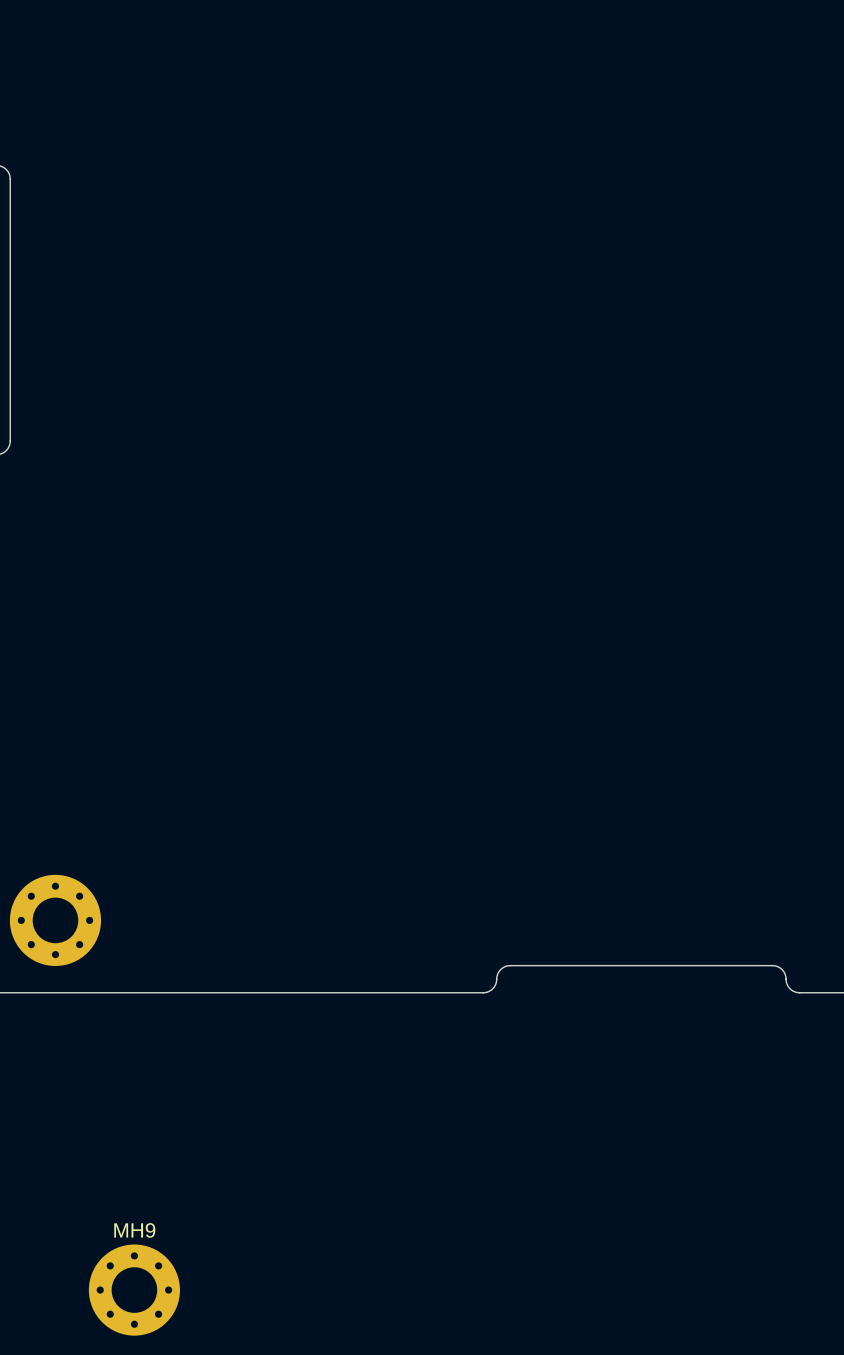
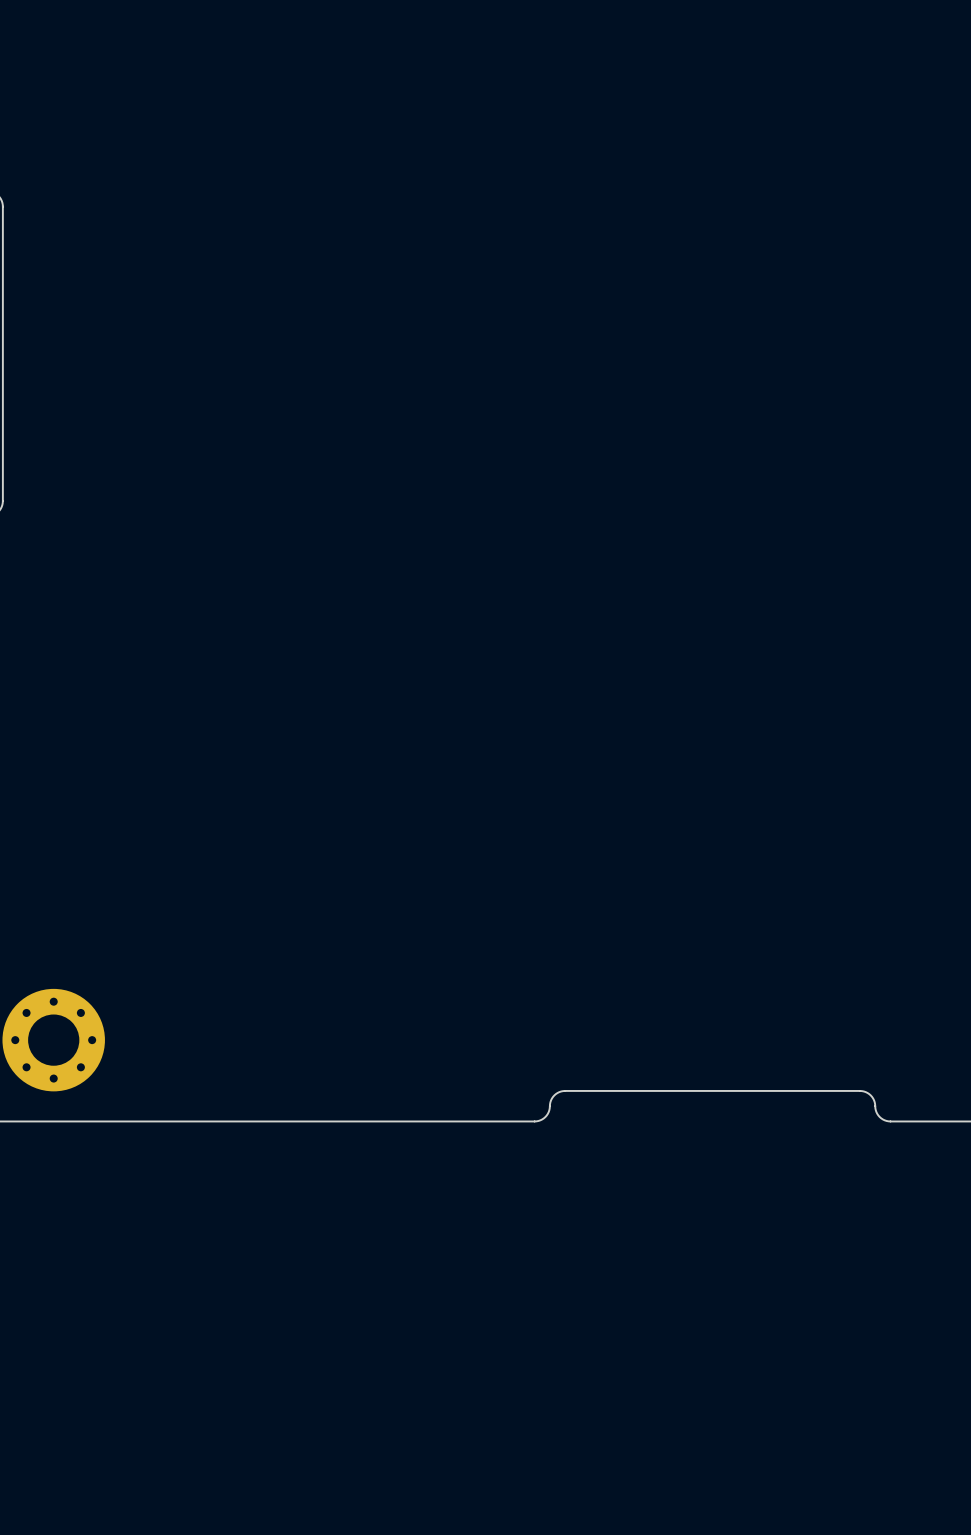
MH9: (134, 1290) -> none

